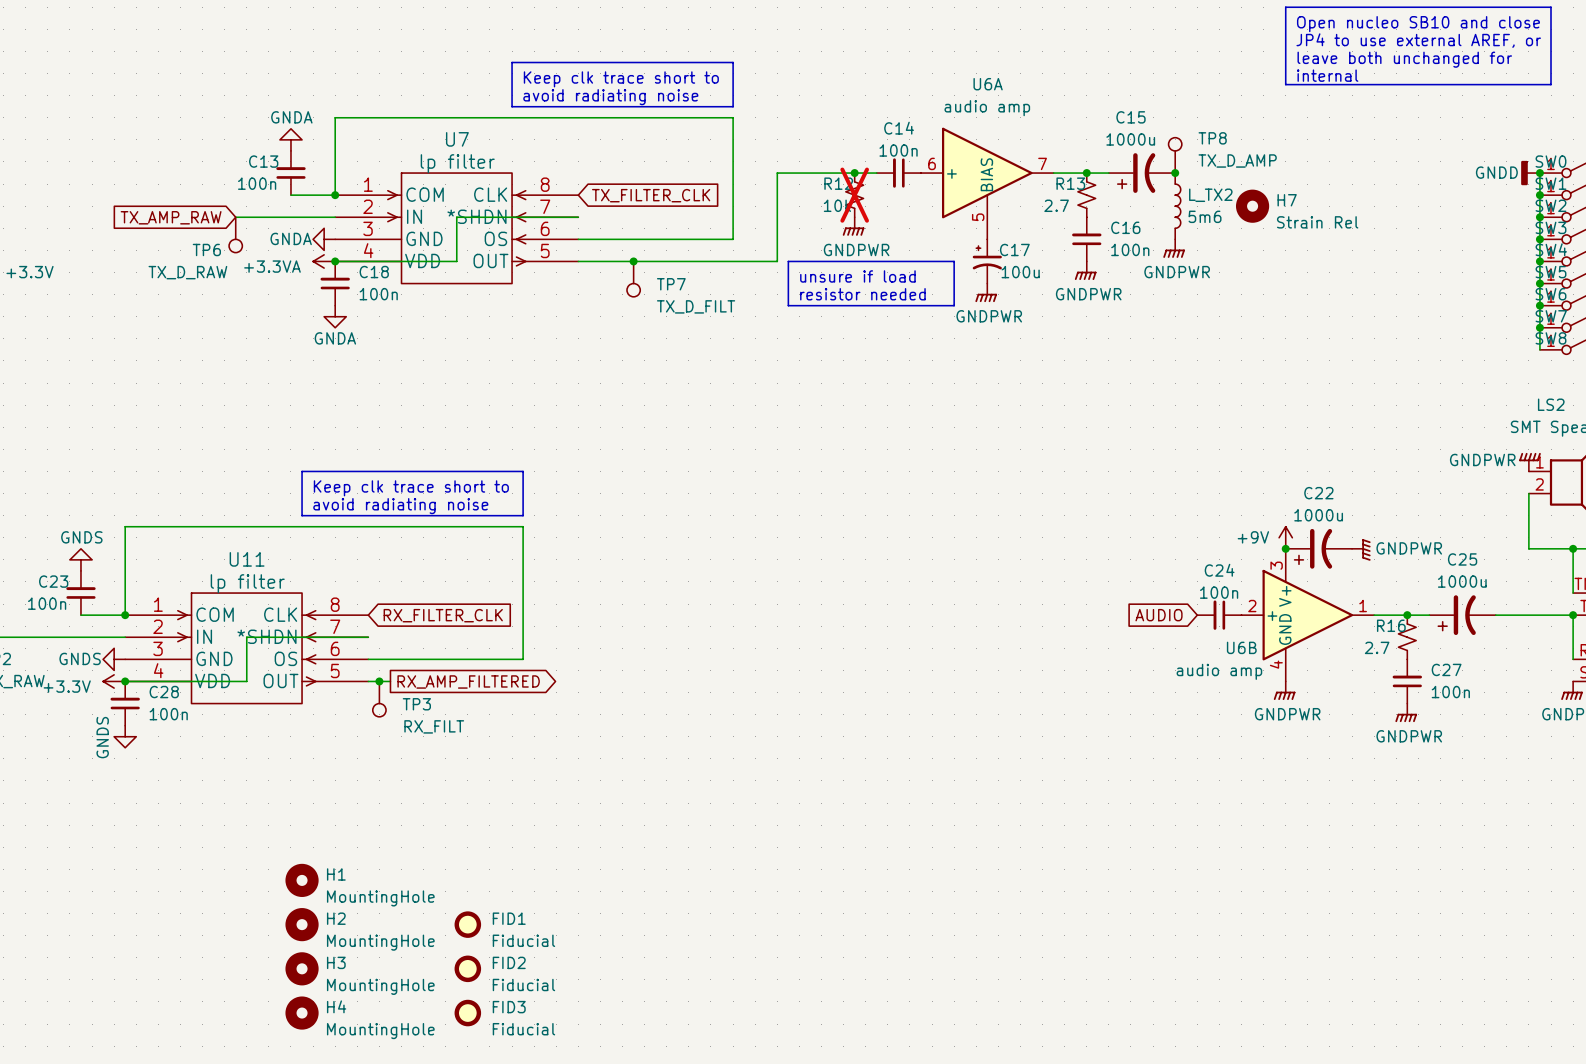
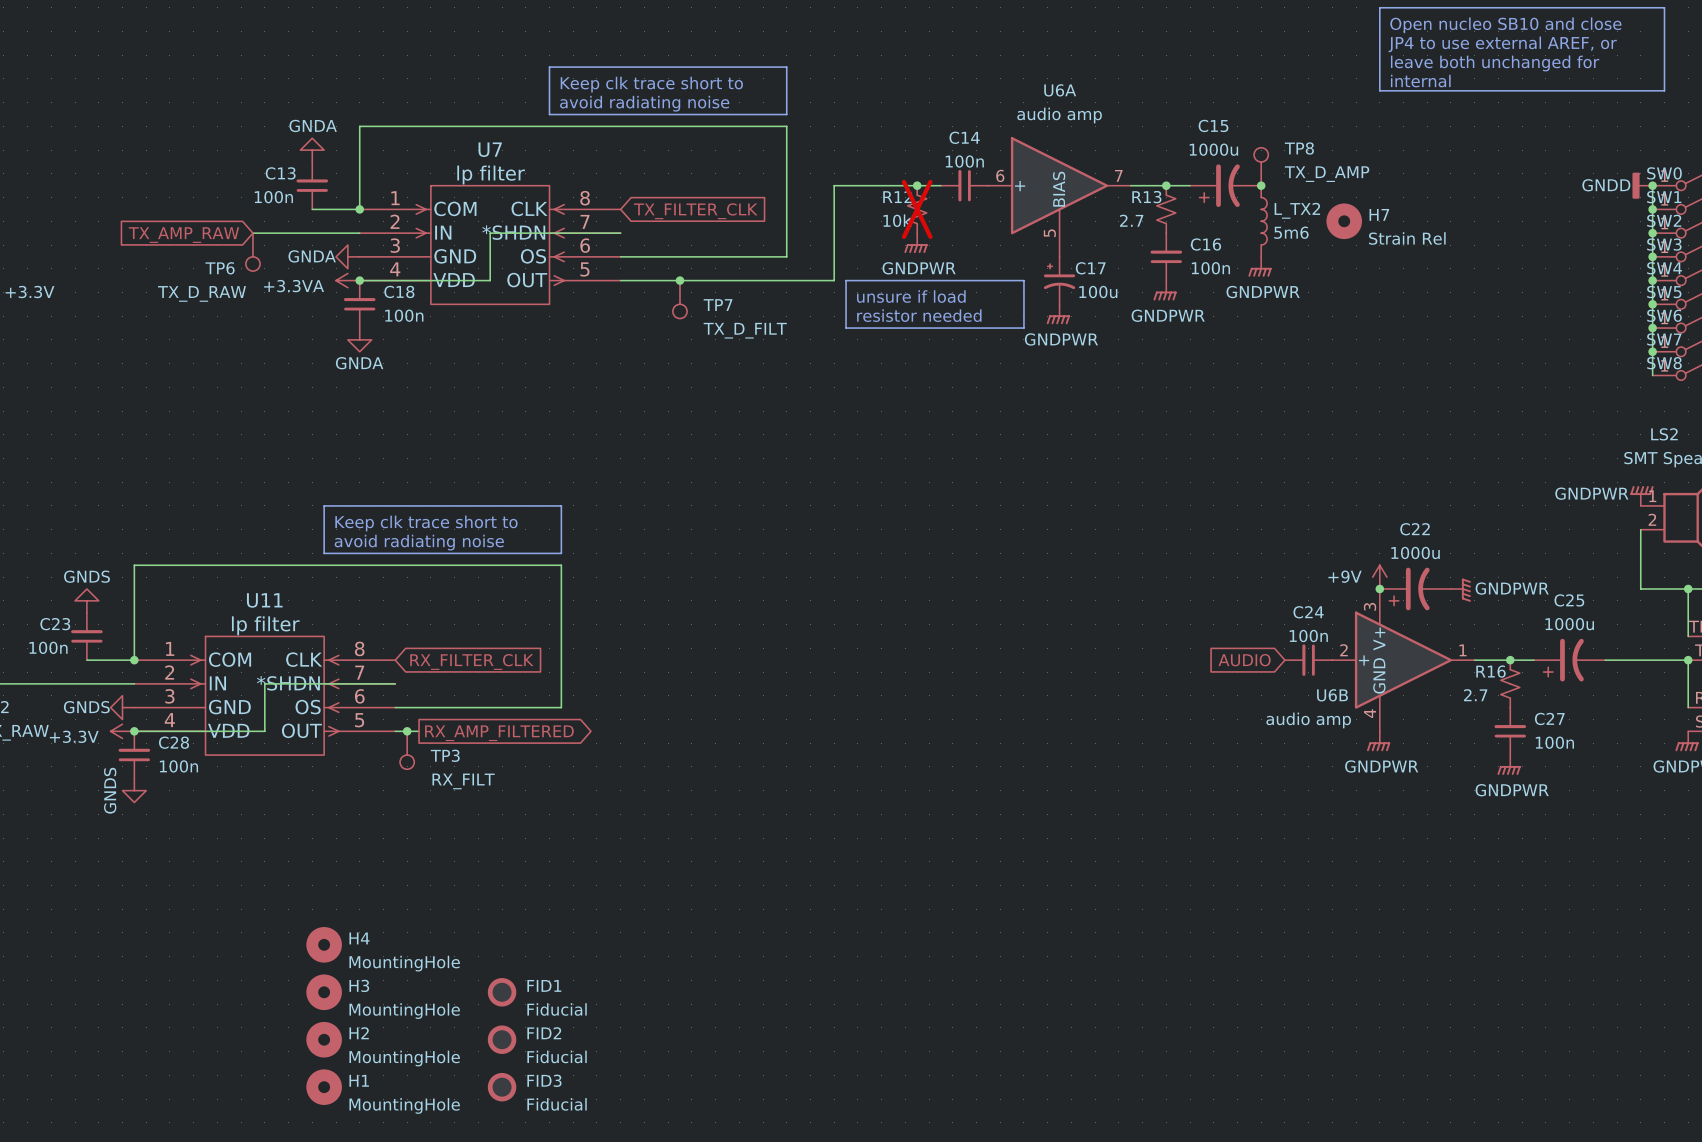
H1 name: H1 (336, 874) -> H4 (359, 938)
H2 name: H2 (336, 918) -> H3 (359, 985)
H3 name: H3 (336, 962) -> H2 (359, 1033)
H4 name: H4 (336, 1006) -> H1 (359, 1080)

